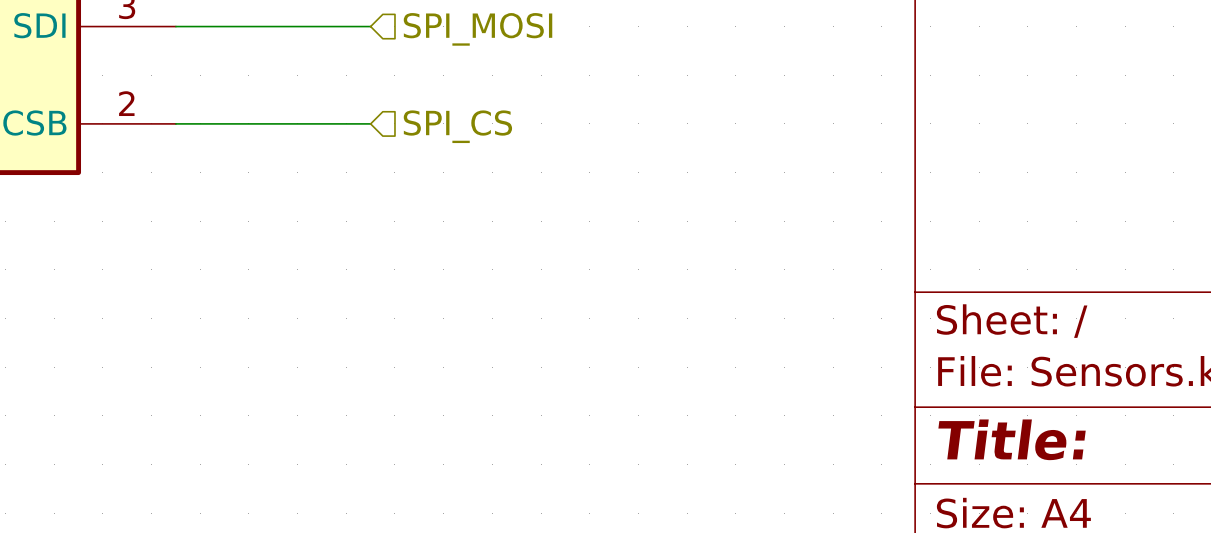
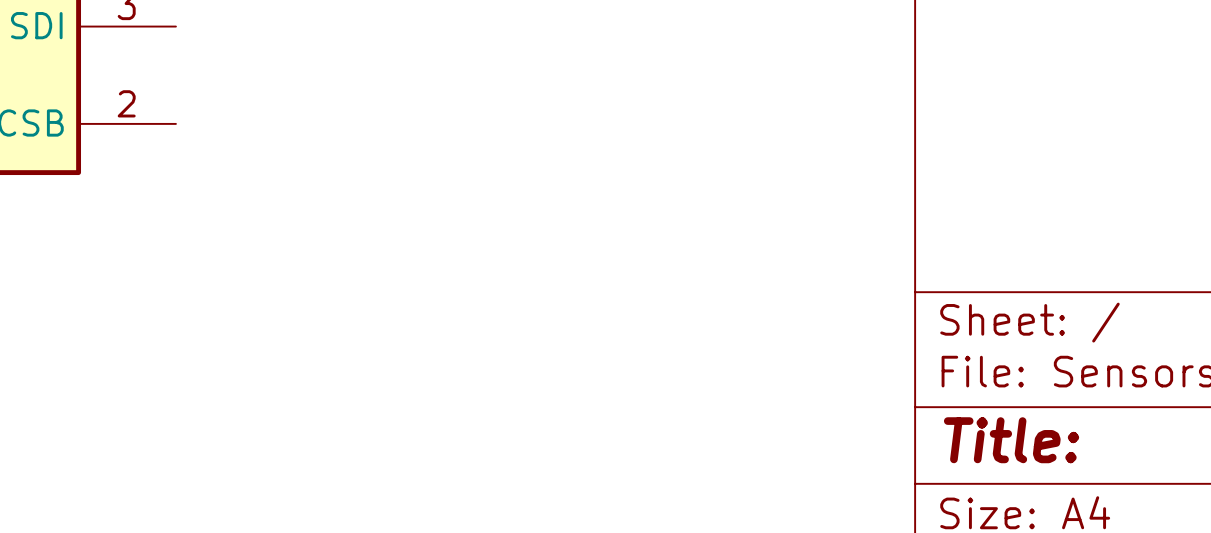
wire: (175, 26) (370, 26) -> none
hierarchical label: SPI_MOSI (478, 29) -> none
wire: (175, 123) (370, 123) -> none
hierarchical label: SPI_CS (457, 126) -> none

